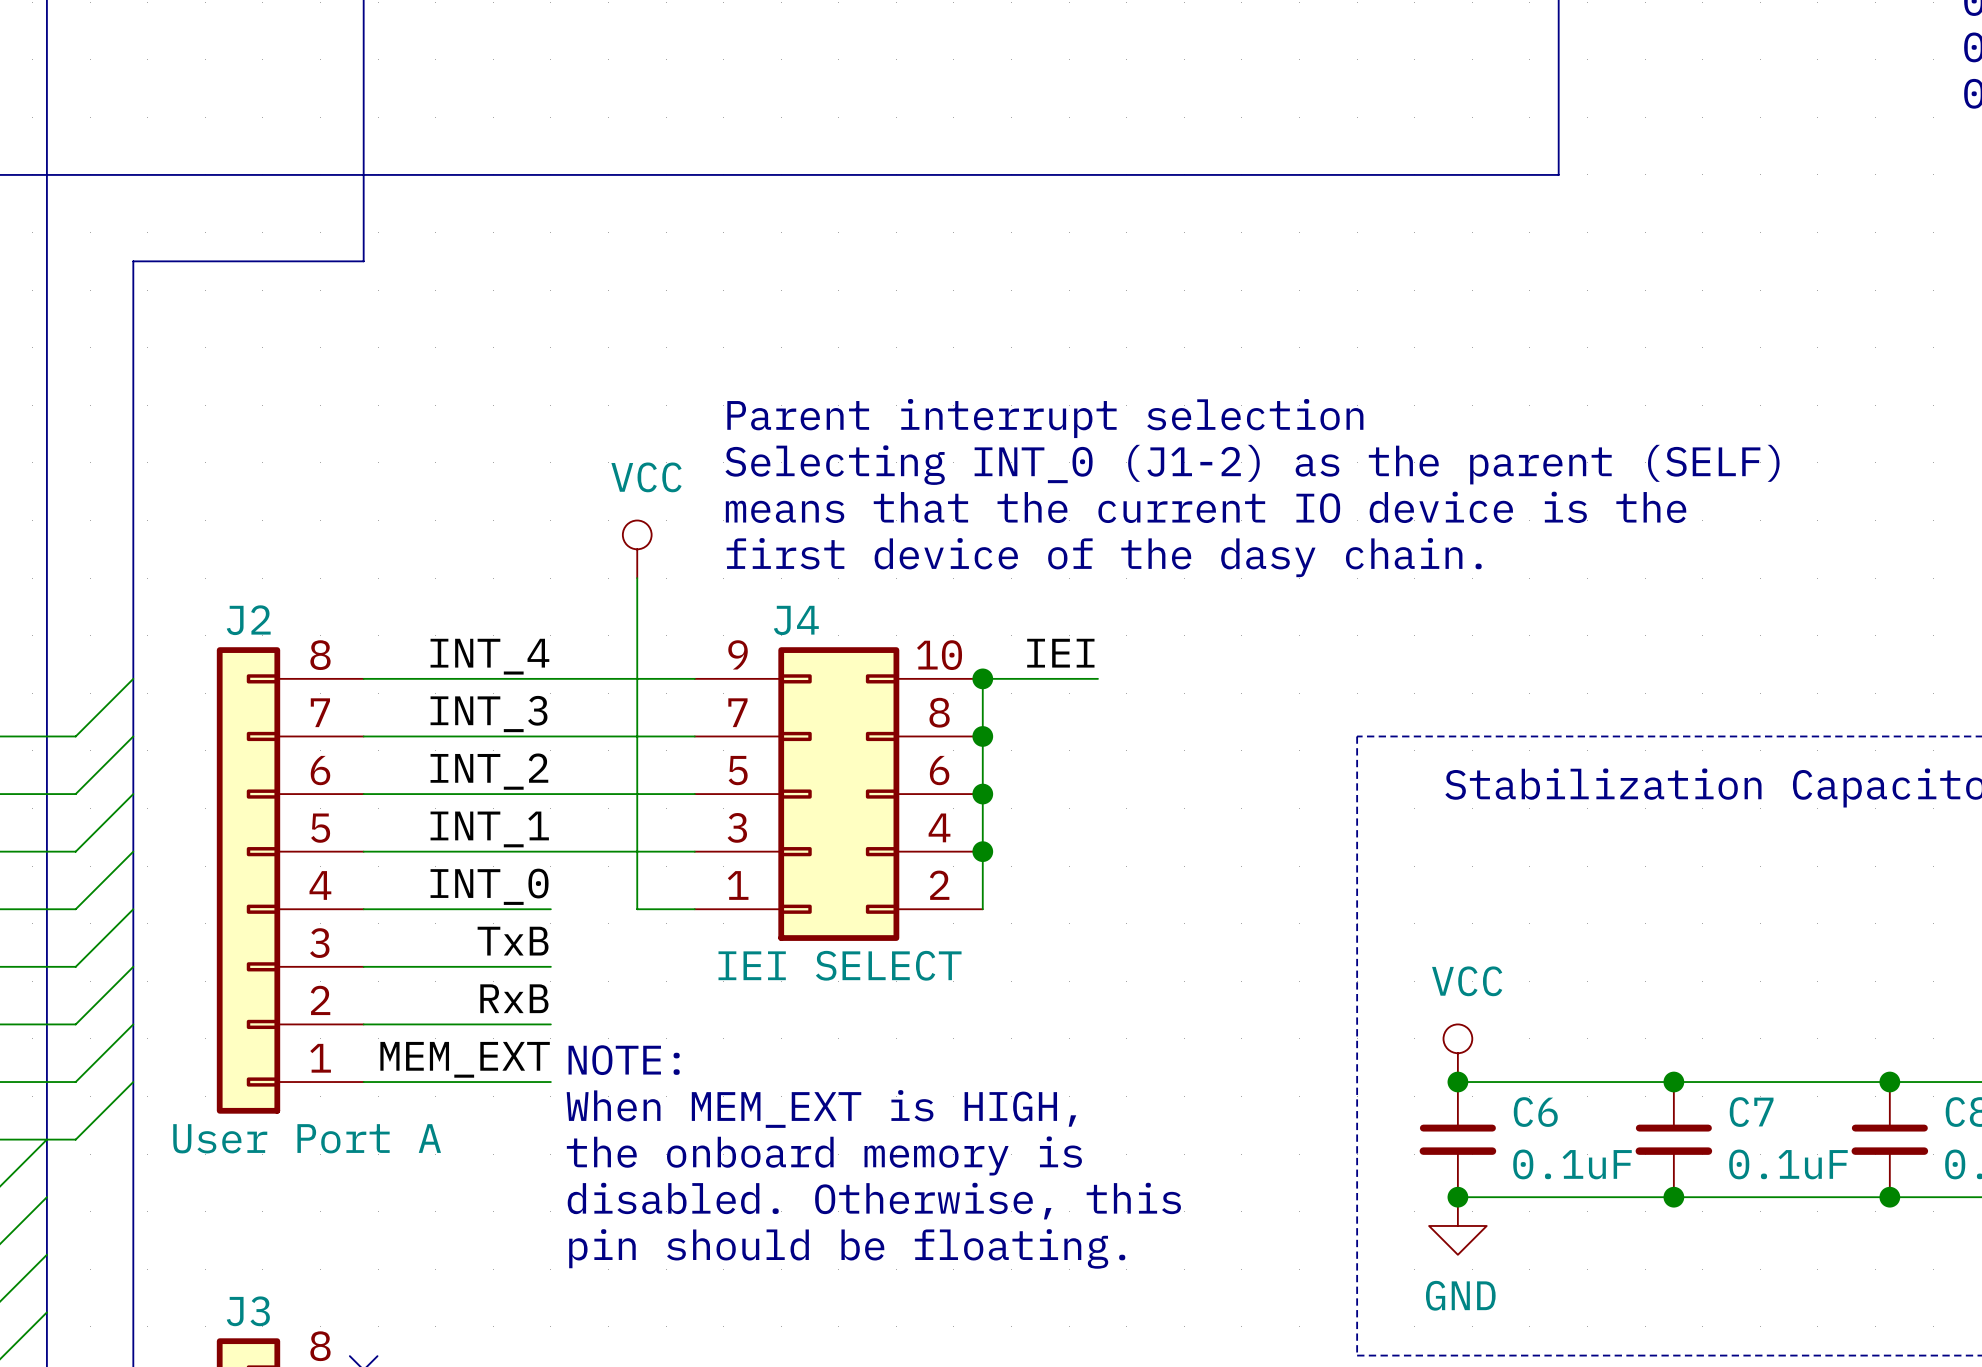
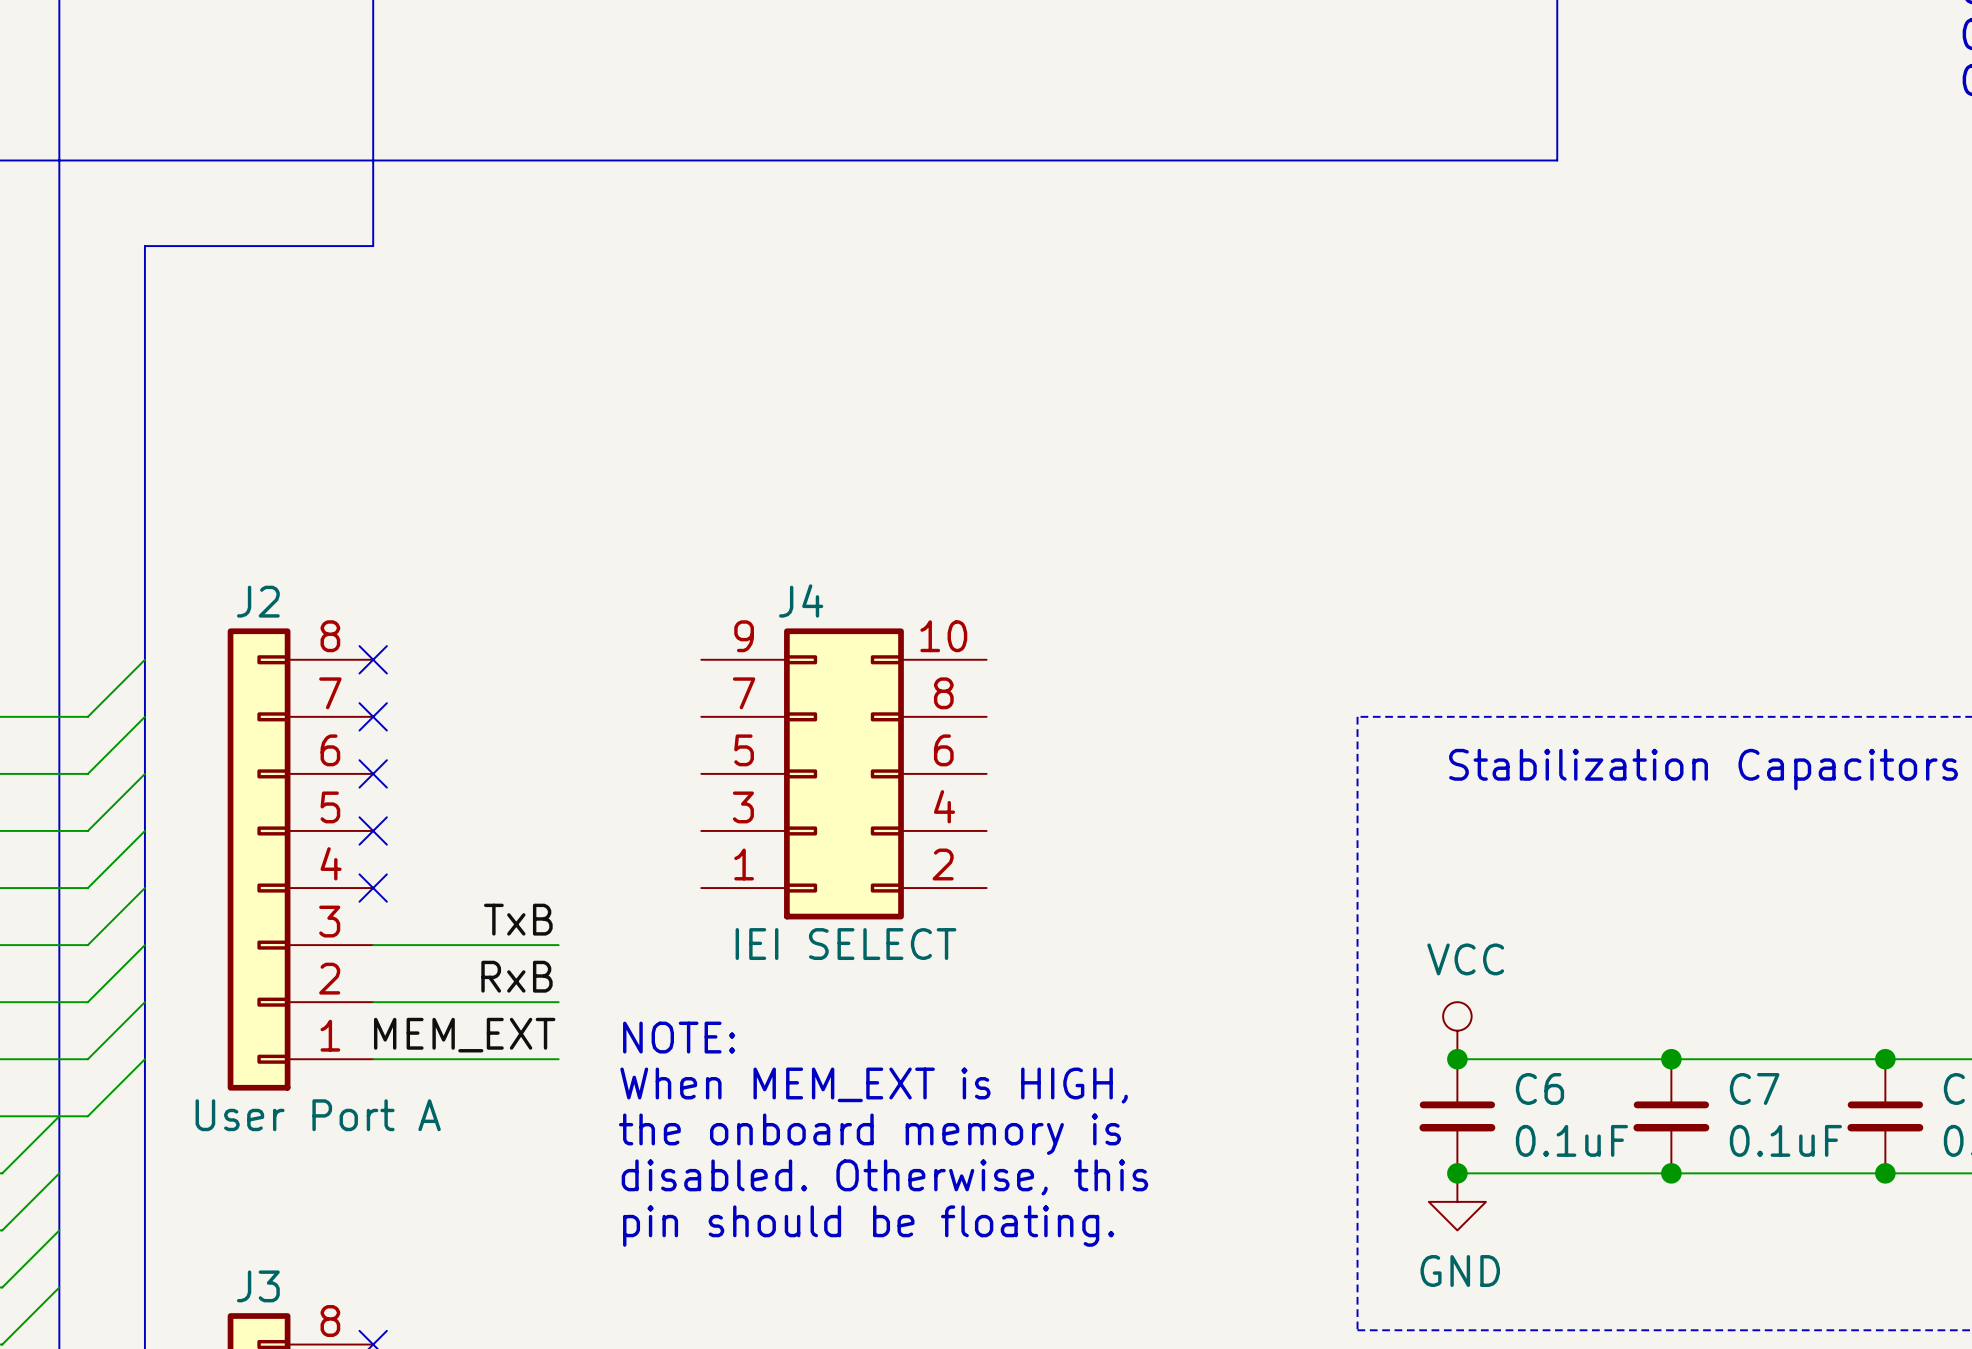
text: Parent interrupt selection (1045, 418) -> none
text: Selecting INT_0 (J1-2) as the parent (SELF) (1252, 464) -> none
text: means that the current IO device is the (1206, 507) -> none
power symbol: VCC (637, 549) -> none
text: first device of the dasy chain. (1104, 557) -> none
wire: (637, 578) (637, 909) (694, 909) -> none
label: IEI (1060, 653) -> none
label: INT_4 (489, 656) -> none
wire: (363, 678) (694, 678) -> none
no-connect mark: none -> (373, 659)
junction: (982, 678) -> none
wire: (1097, 678) (982, 678) (982, 909) -> none
label: INT_3 (489, 714) -> none
wire: (363, 736) (694, 736) -> none
no-connect mark: none -> (373, 716)
junction: (982, 736) -> none
label: INT_2 (489, 771) -> none
wire: (363, 794) (694, 794) -> none
no-connect mark: none -> (373, 773)
junction: (982, 794) -> none
label: INT_1 (489, 829) -> none
wire: (363, 851) (694, 851) -> none
no-connect mark: none -> (373, 830)
junction: (982, 851) -> none
label: INT_0 (489, 886) -> none
wire: (363, 909) (550, 909) -> none
no-connect mark: none -> (373, 888)
text position: NOTE: (624, 1060) -> NOTE: (679, 1037)
text position: When MEM_EXT is HIGH, (821, 1108) -> When MEM_EXT is HIGH, (874, 1085)
text position: the onboard memory is (824, 1155) -> the onboard memory is (869, 1134)
text position: disabled. Otherwise, this (874, 1201) -> disabled. Otherwise, this (884, 1177)
text position: pin should be floating. (847, 1248) -> pin should be floating. (868, 1226)

